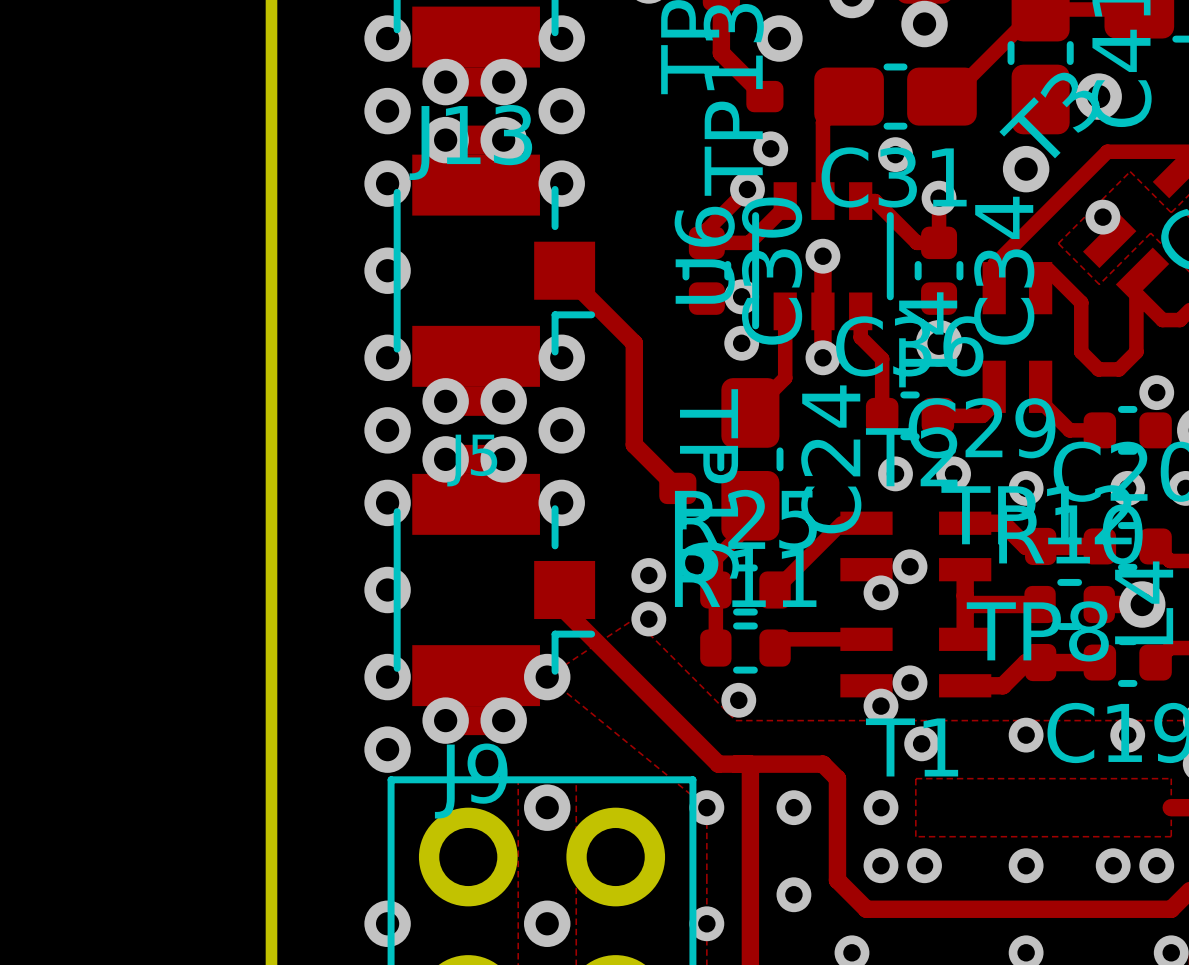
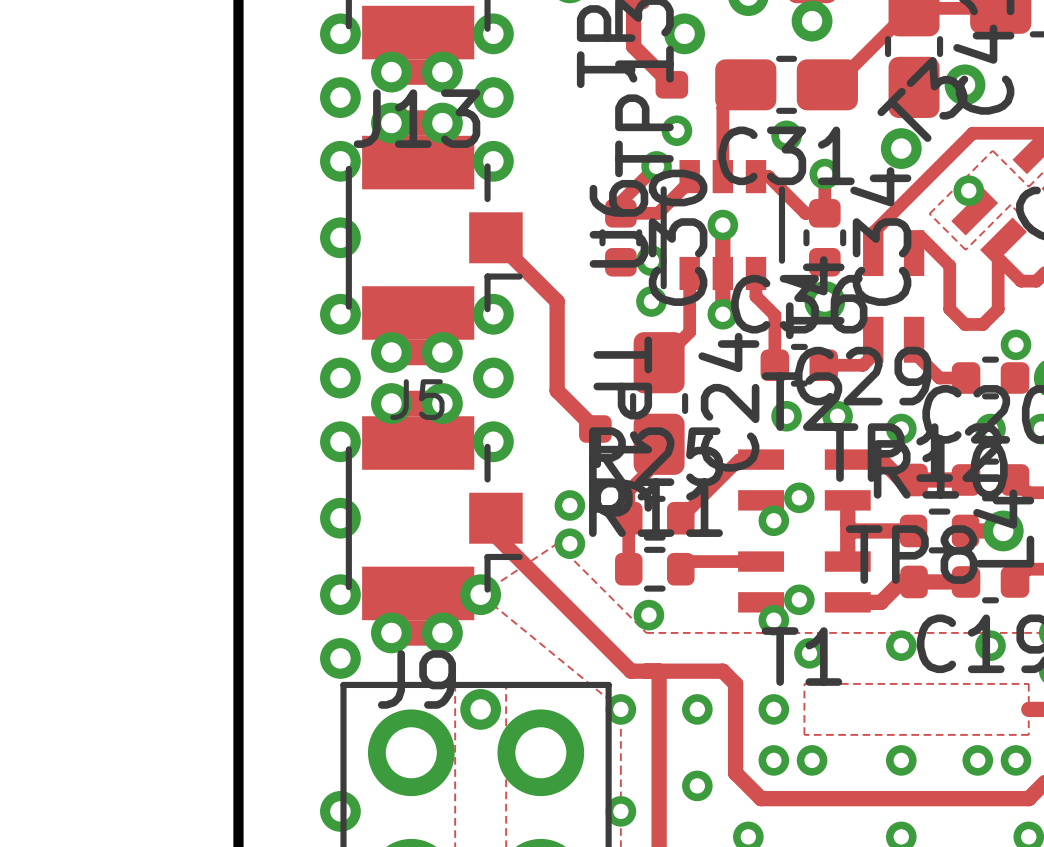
via: (547, 923) -> none

